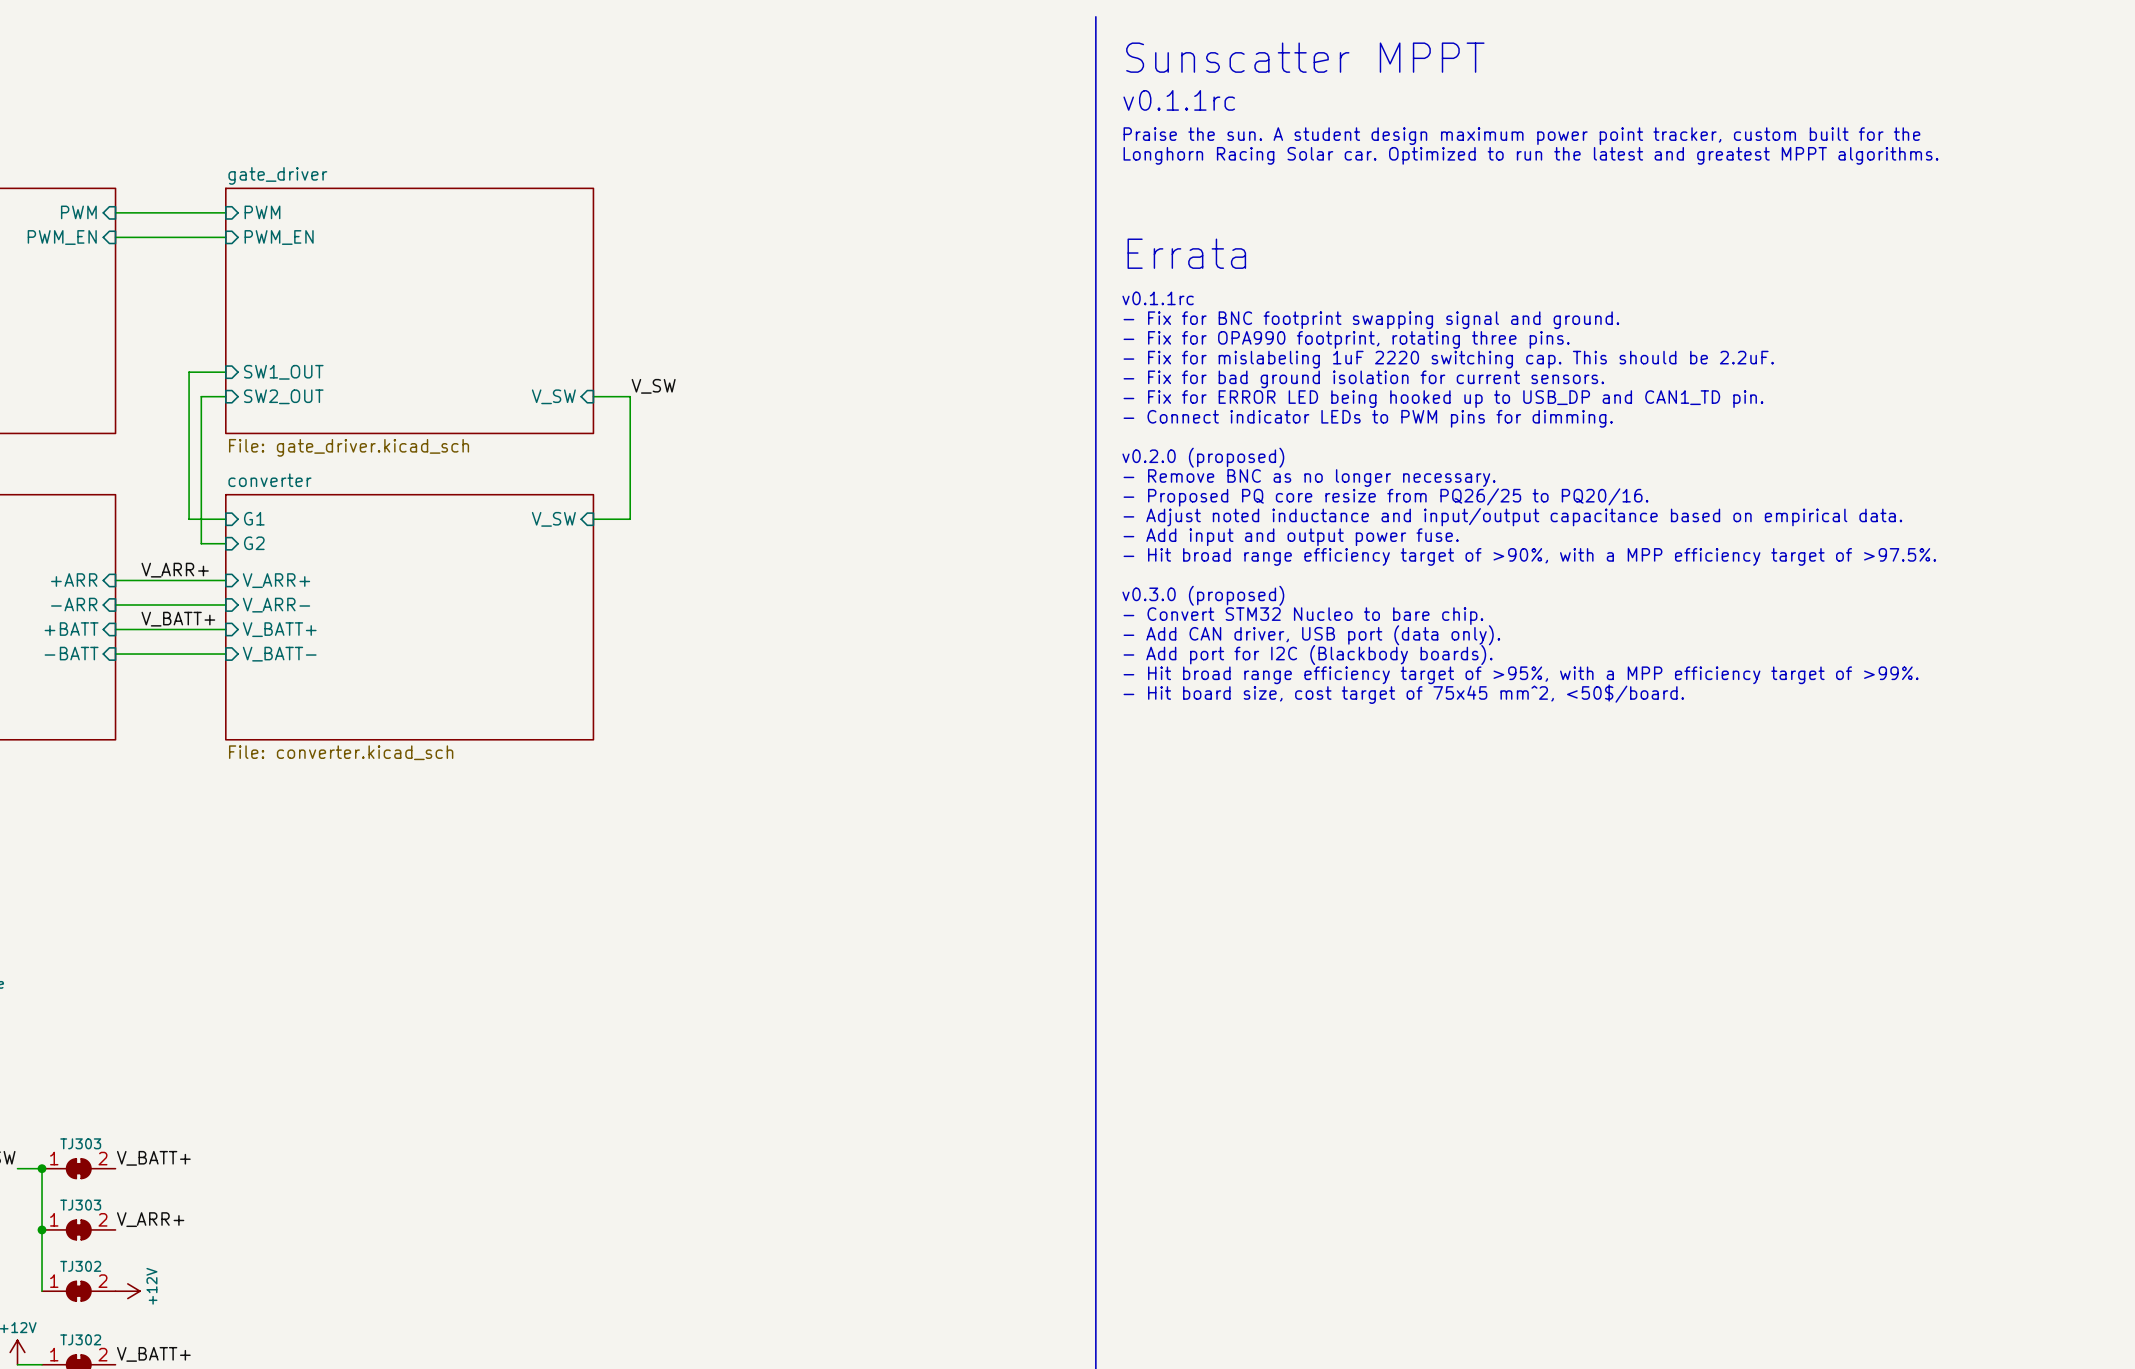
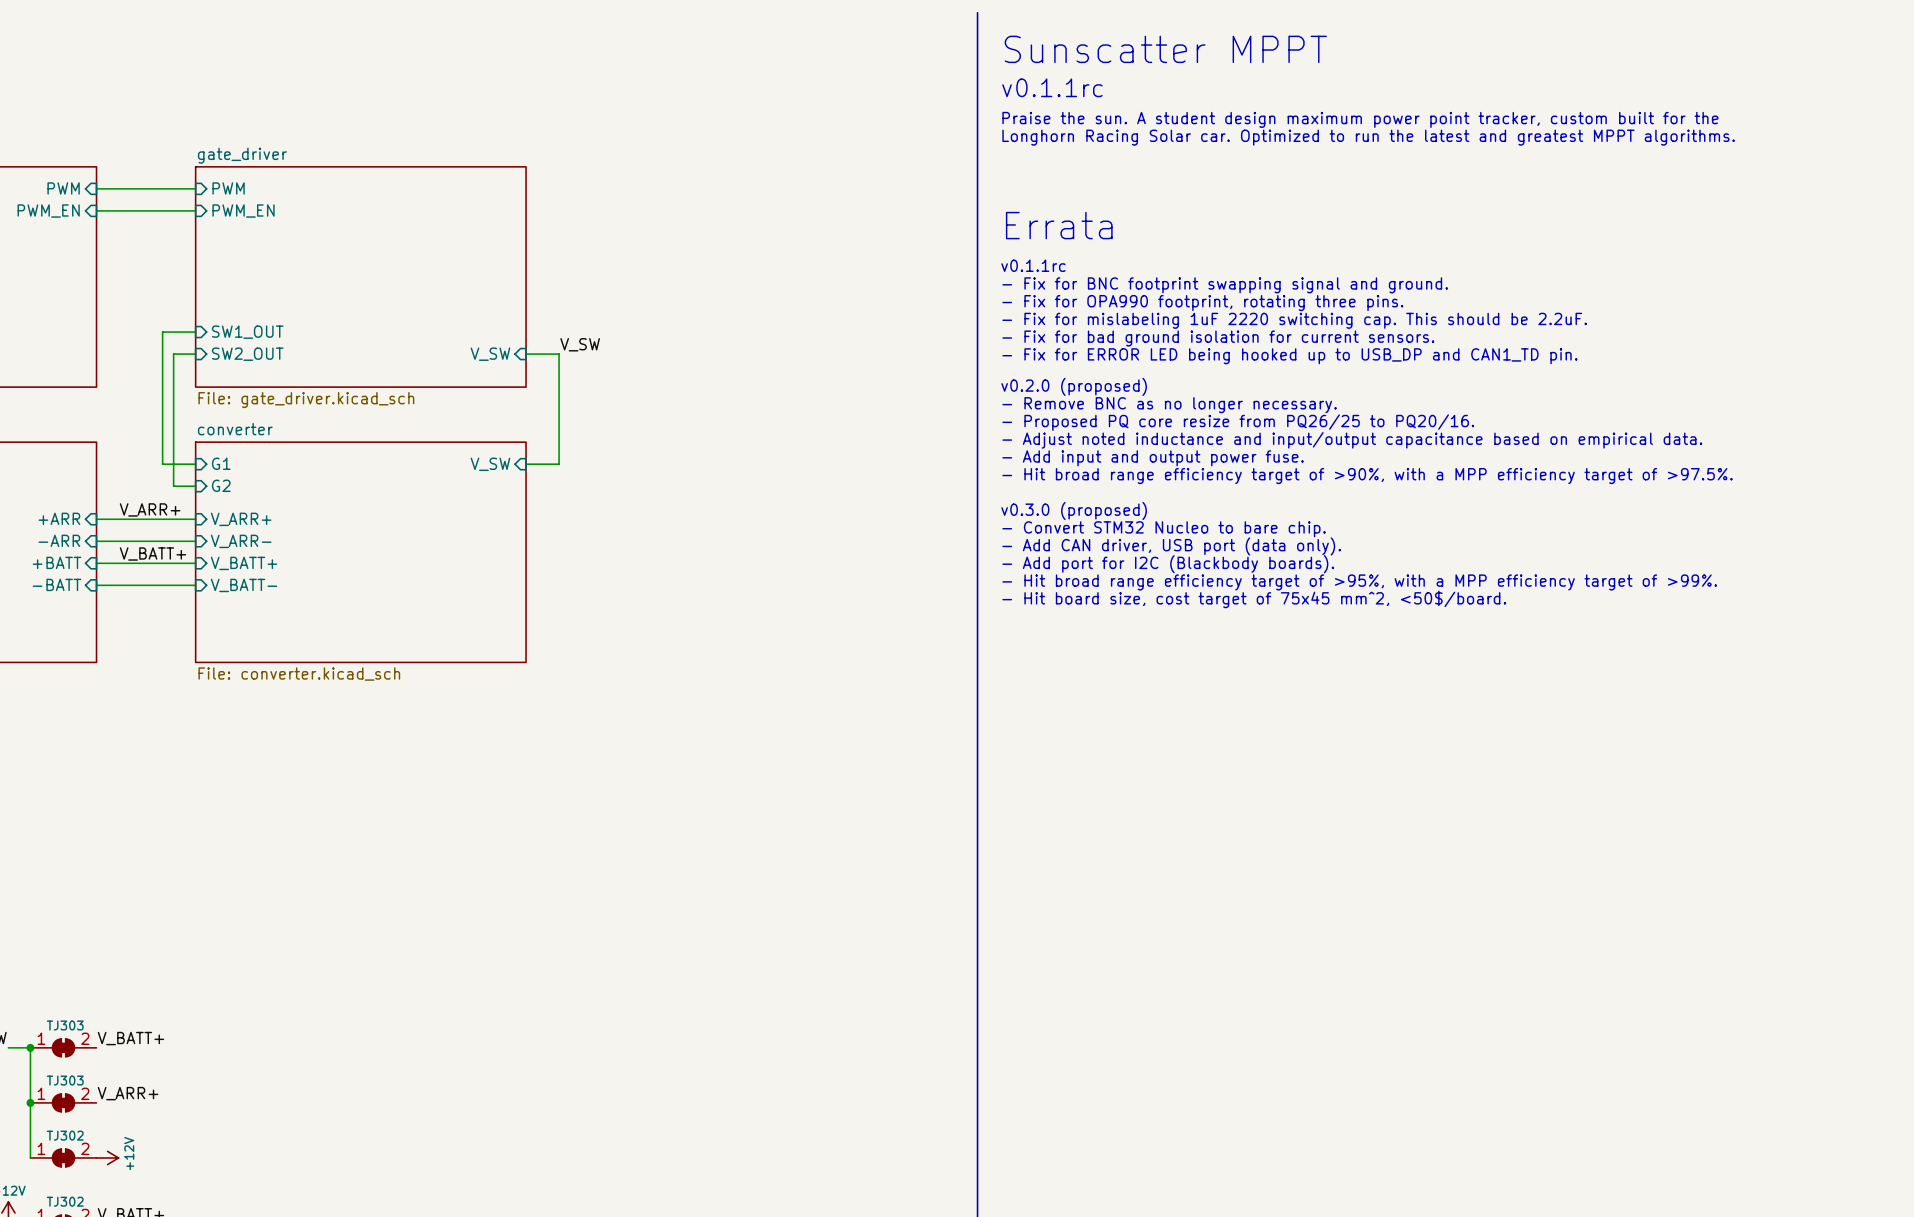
text: - Connect indicator LEDs to PWM pins for dimming. (1368, 418) -> none
text position: v0.2.0 (proposed) (1203, 457) -> v0.2.0 (proposed) (1074, 386)
text position: - Remove BNC as no longer necessary. (1309, 478) -> - Remove BNC as no longer necessary. (1169, 405)
text position: - Proposed PQ core resize from PQ26/25 to PQ20/16. (1385, 497) -> - Proposed PQ core resize from PQ26/25 to PQ20/16. (1238, 422)
text position: - Adjust noted inductance and input/output capacitance based on empirical data. (1512, 517) -> - Adjust noted inductance and input/output capacitance based on empirical data. (1352, 440)
text position: - Add input and output power fuse. (1291, 537) -> - Add input and output power fuse. (1153, 458)
text position: - Hit broad range efficiency target of >90%, with a MPP efficiency target of >97.5%. (1529, 556) -> - Hit broad range efficiency target of >90%, with a MPP efficiency target of >97.5%. (1367, 476)
text position: v0.3.0 (proposed) (1203, 595) -> v0.3.0 (proposed) (1074, 510)
text position: - Convert STM32 Nucleo to bare chip. (1303, 616) -> - Convert STM32 Nucleo to bare chip. (1164, 529)
text position: - Add CAN driver, USB port (data only). (1311, 635) -> - Add CAN driver, USB port (data only). (1171, 546)
text position: - Add port for I2C (Blackbody boards). (1308, 654) -> - Add port for I2C (Blackbody boards). (1168, 564)
text position: - Hit broad range efficiency target of >95%, with a MPP efficiency target of >99%. (1521, 675) -> - Hit broad range efficiency target of >95%, with a MPP efficiency target of >99%. (1359, 582)
text position: - Hit board size, cost target of 75x45 mm^2, <50$/board. (1403, 694) -> - Hit board size, cost target of 75x45 mm^2, <50$/board. (1254, 599)

